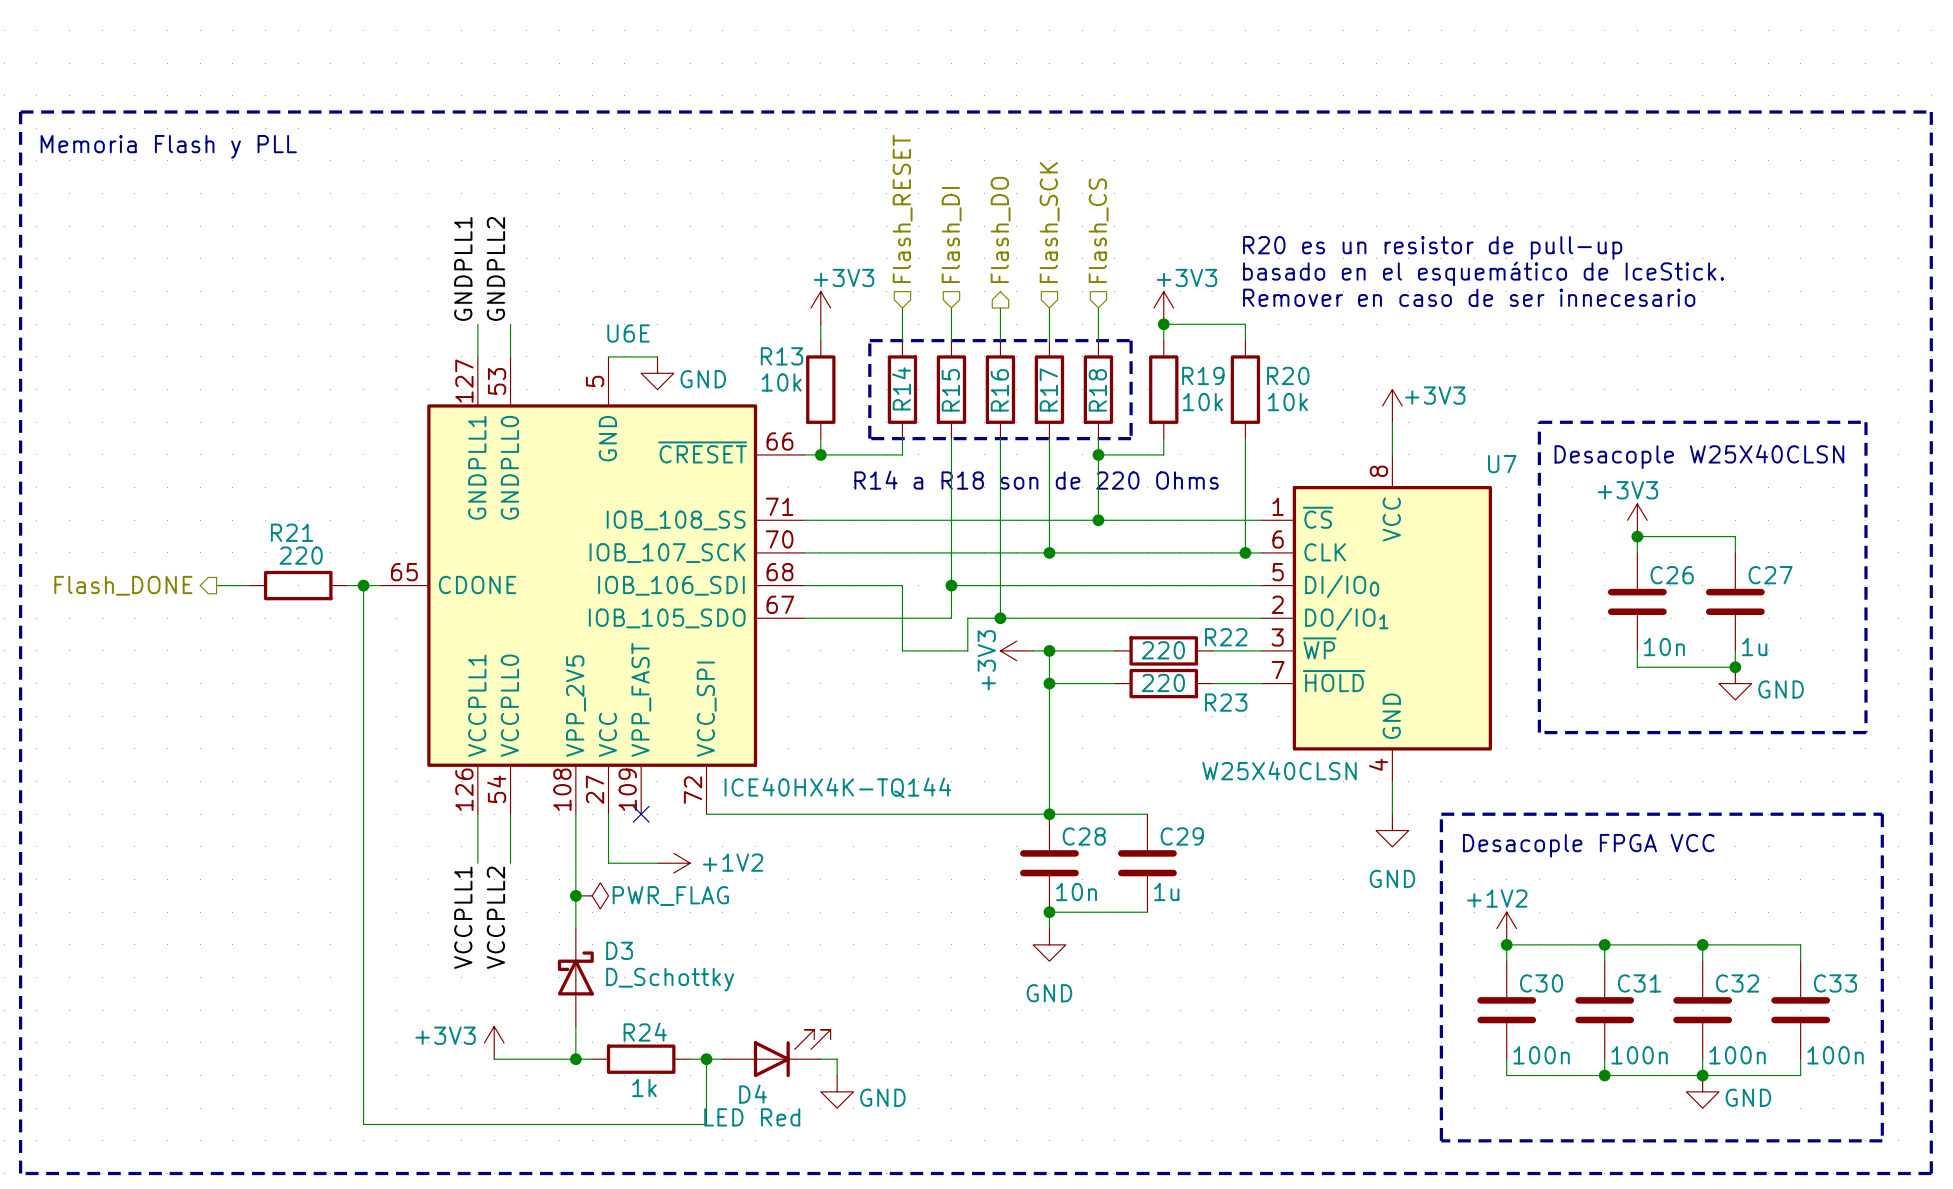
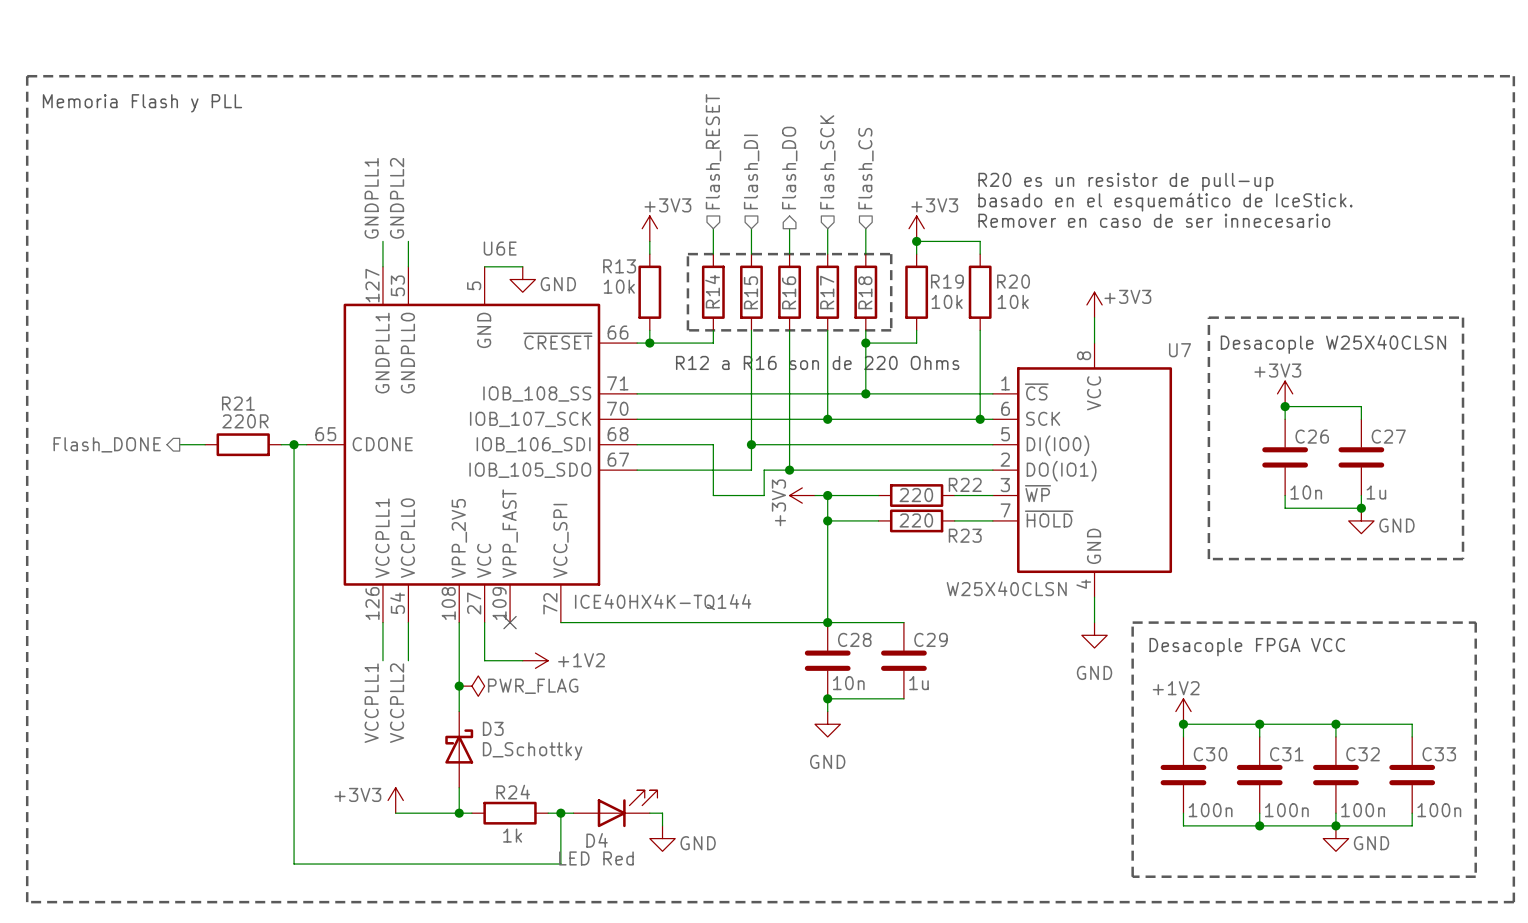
text: R14 a R18 son de 220 Ohms (1036, 480) -> R12 a R16 son de 220 Ohms (817, 362)
U7 pin name: CLK (1325, 552) -> SCK (1043, 418)
R21 value: 220 (301, 555) -> 220R (245, 421)
U7 pin name: DI/IO0 (1342, 586) -> DI(IO0) (1057, 445)
U7 pin name: DO/IO1 (1346, 619) -> DO(IO1) (1061, 471)

